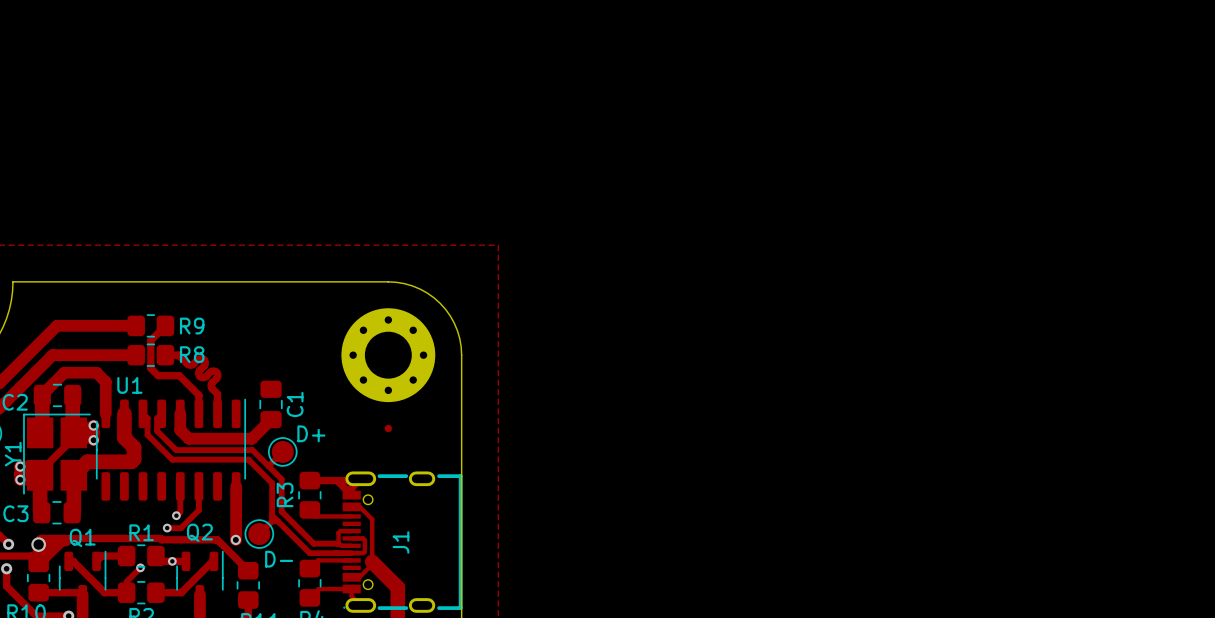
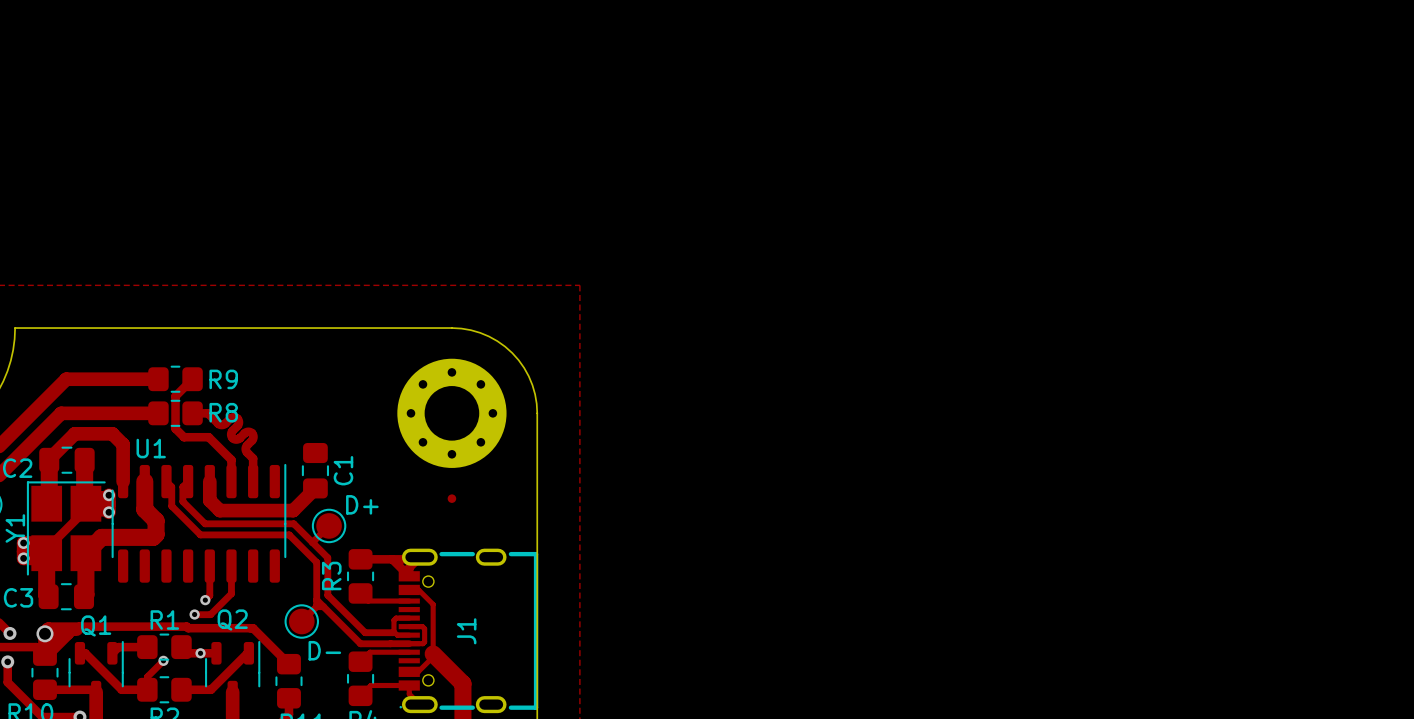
track: (236, 486) (235, 539) -> none
via: (235, 539) -> none

